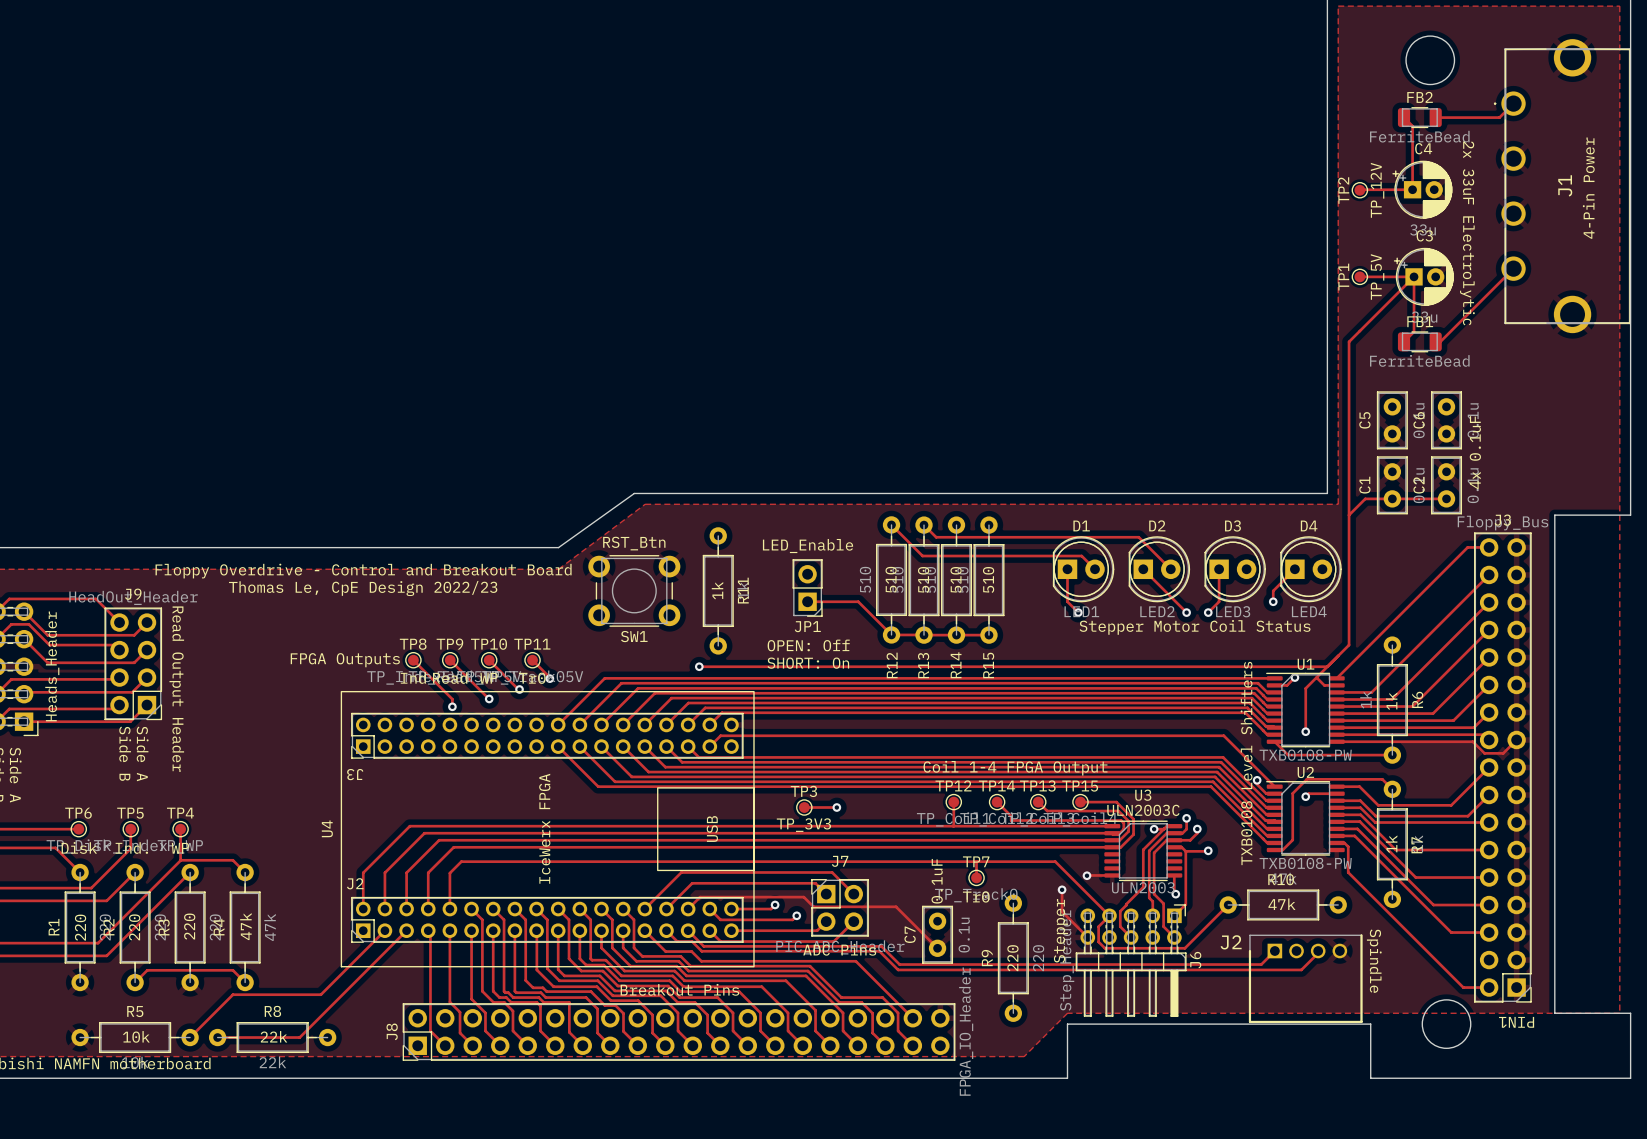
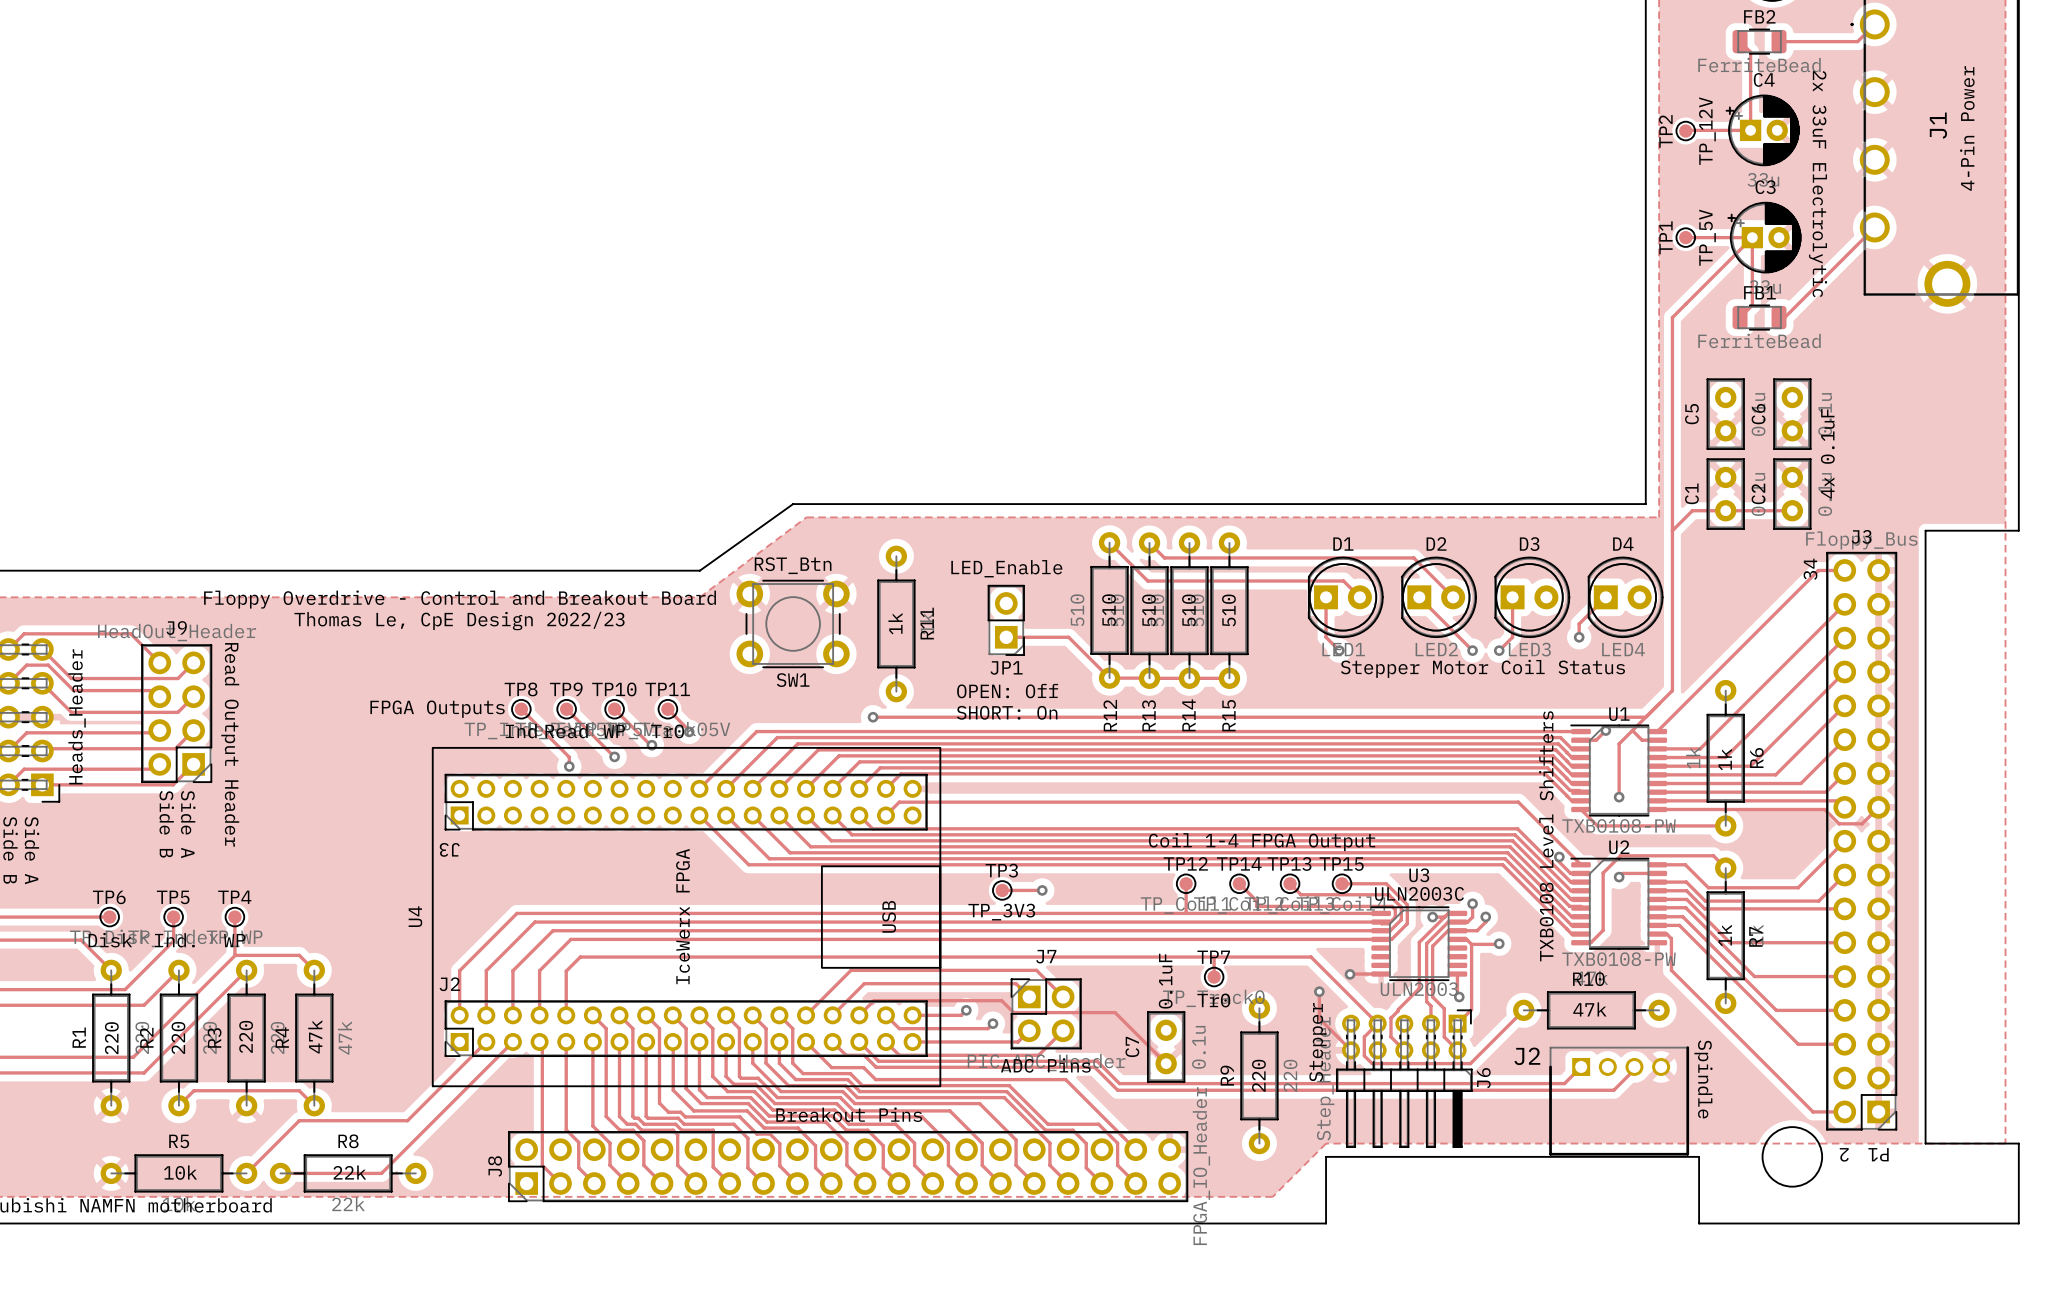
text: none -> 34 (1810, 569)
text: none -> 2 (1844, 1154)
text: PIN1 (1516, 1022) -> P1 (1878, 1154)

